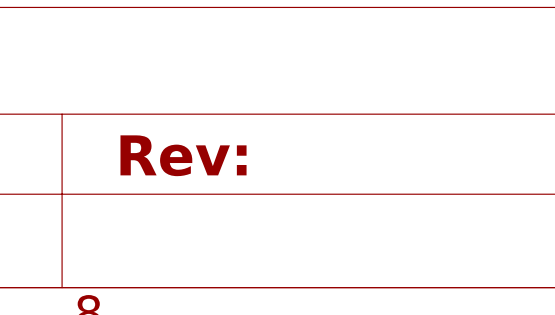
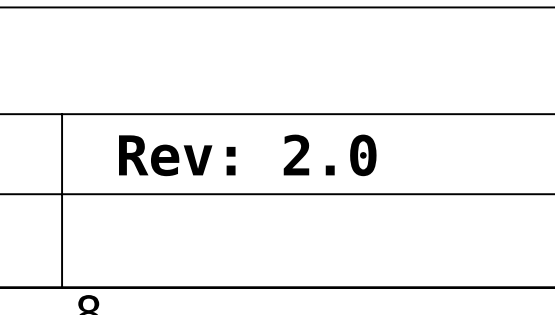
title block: Rev: (183, 155) -> Rev: 2.0 (247, 155)

